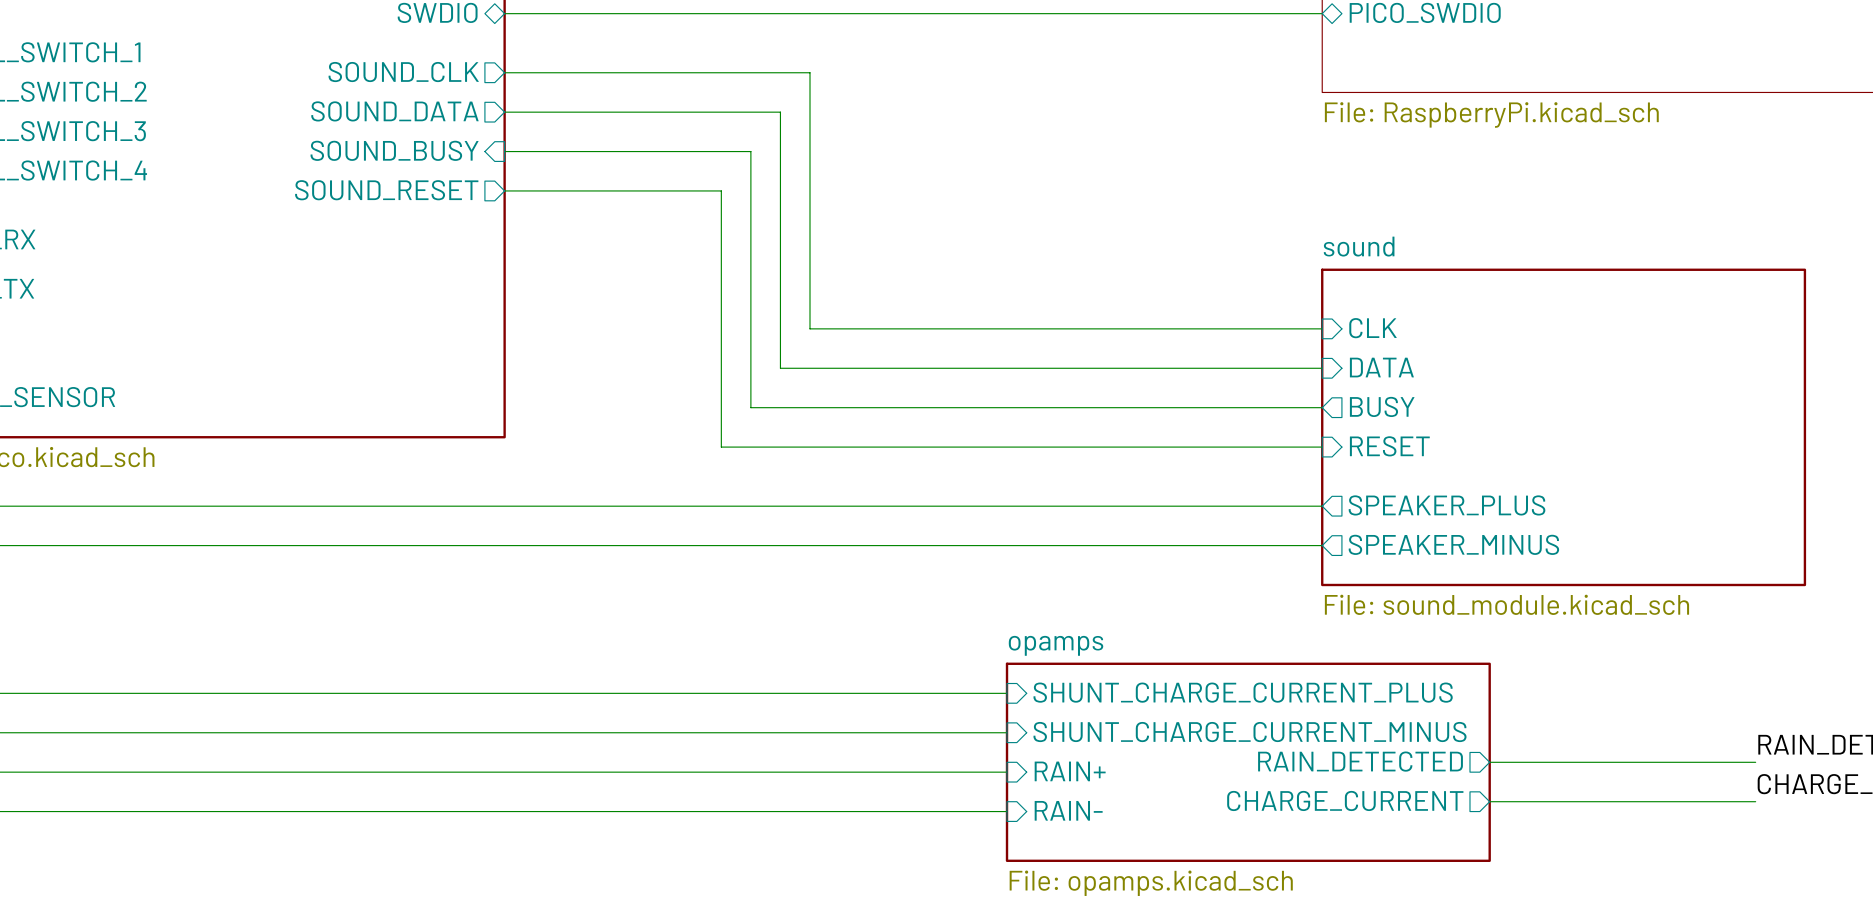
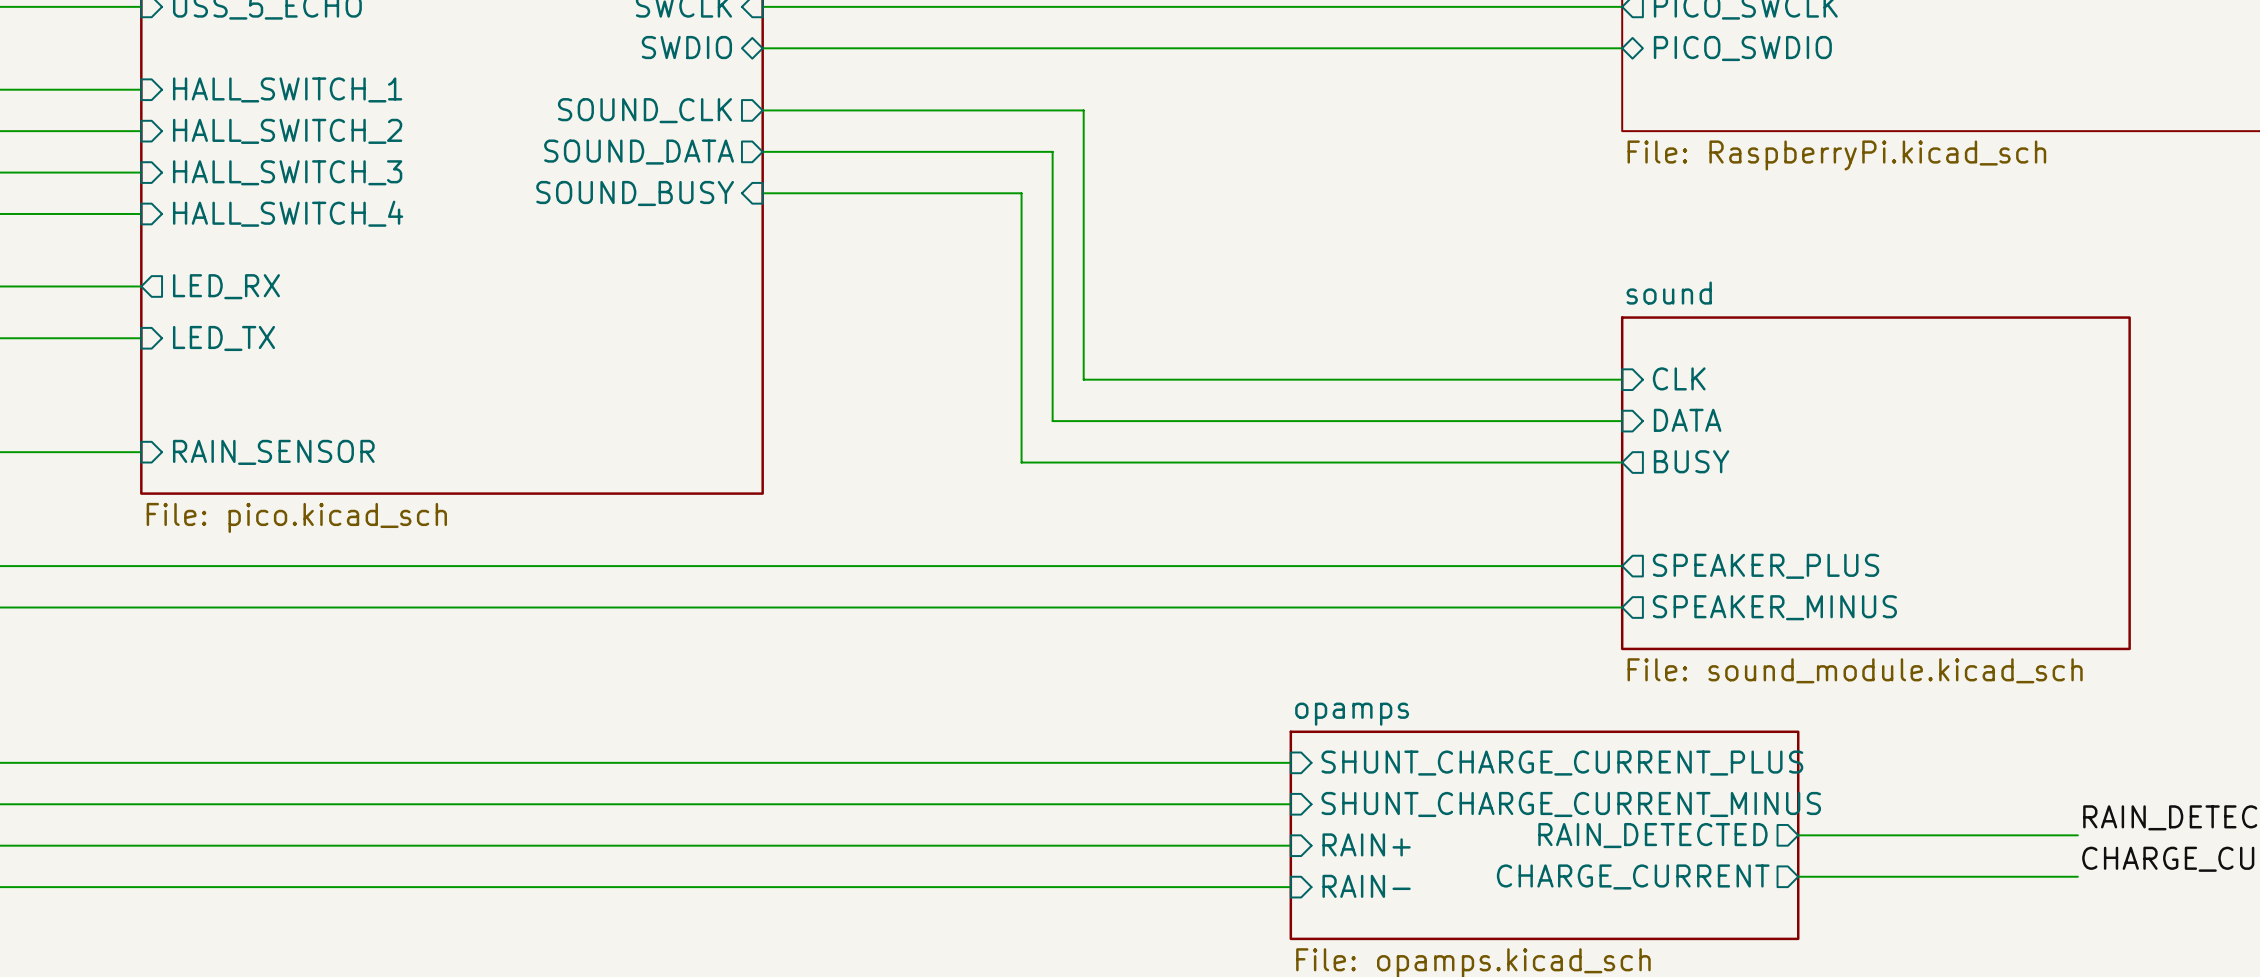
sheet pin: SOUND_RESET (386, 190) -> none
wire: (504, 190) (721, 190) (721, 447) (1322, 447) -> none
sheet pin: RESET (1389, 446) -> none

